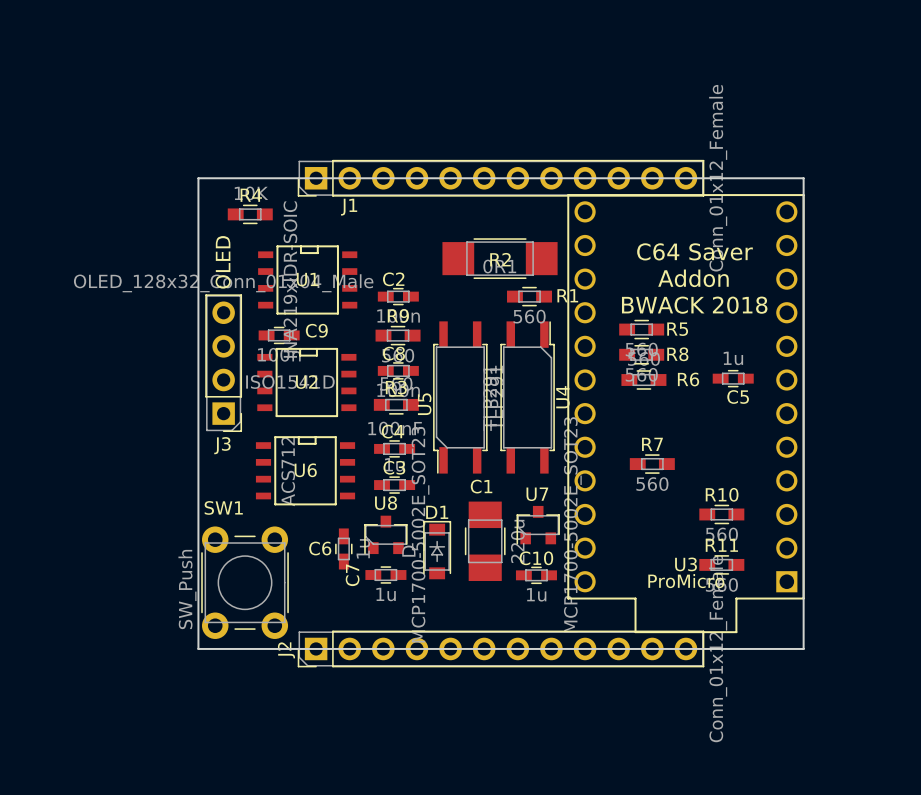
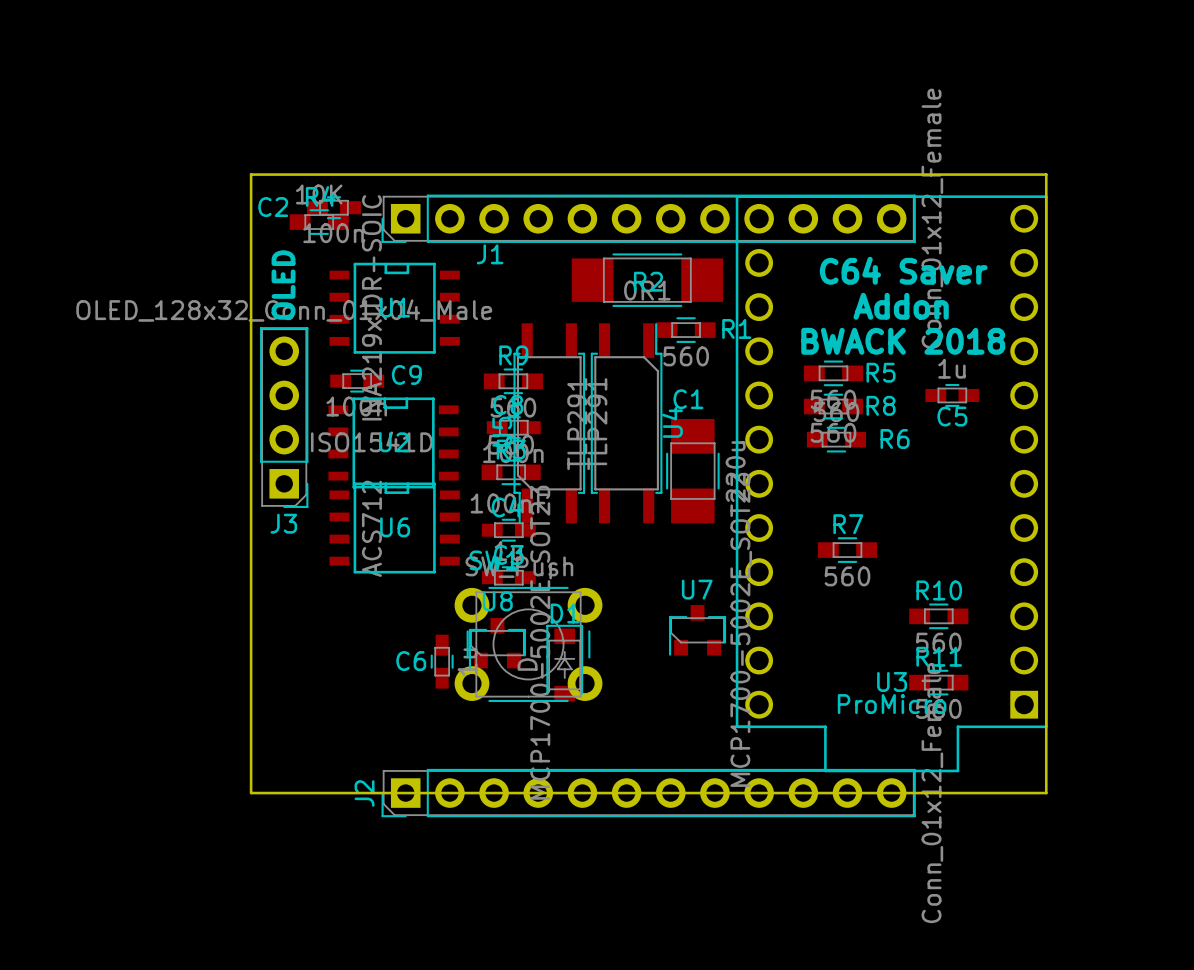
J1 position: (501, 178) -> (648, 218)
J1 name position: J1 (349, 207) -> J1 (490, 254)
C2 name position: C2 (393, 279) -> C2 (273, 207)
C2 position: (398, 296) -> (333, 207)
C5 position: (733, 378) -> (952, 395)
C5 name position: C5 (738, 396) -> C5 (952, 416)
U5 position: (460, 397) -> (549, 423)
U4 position: (527, 397) -> (626, 423)
U6 position: (305, 470) -> (394, 527)
C1 position: (485, 541) -> (692, 471)
C7: 1u (385, 575) -> none
C10: 1u (536, 575) -> none
SW1 rotation: 0° (245, 582) -> 90° clockwise (528, 644)
SW1 position: (245, 582) -> (528, 644)

